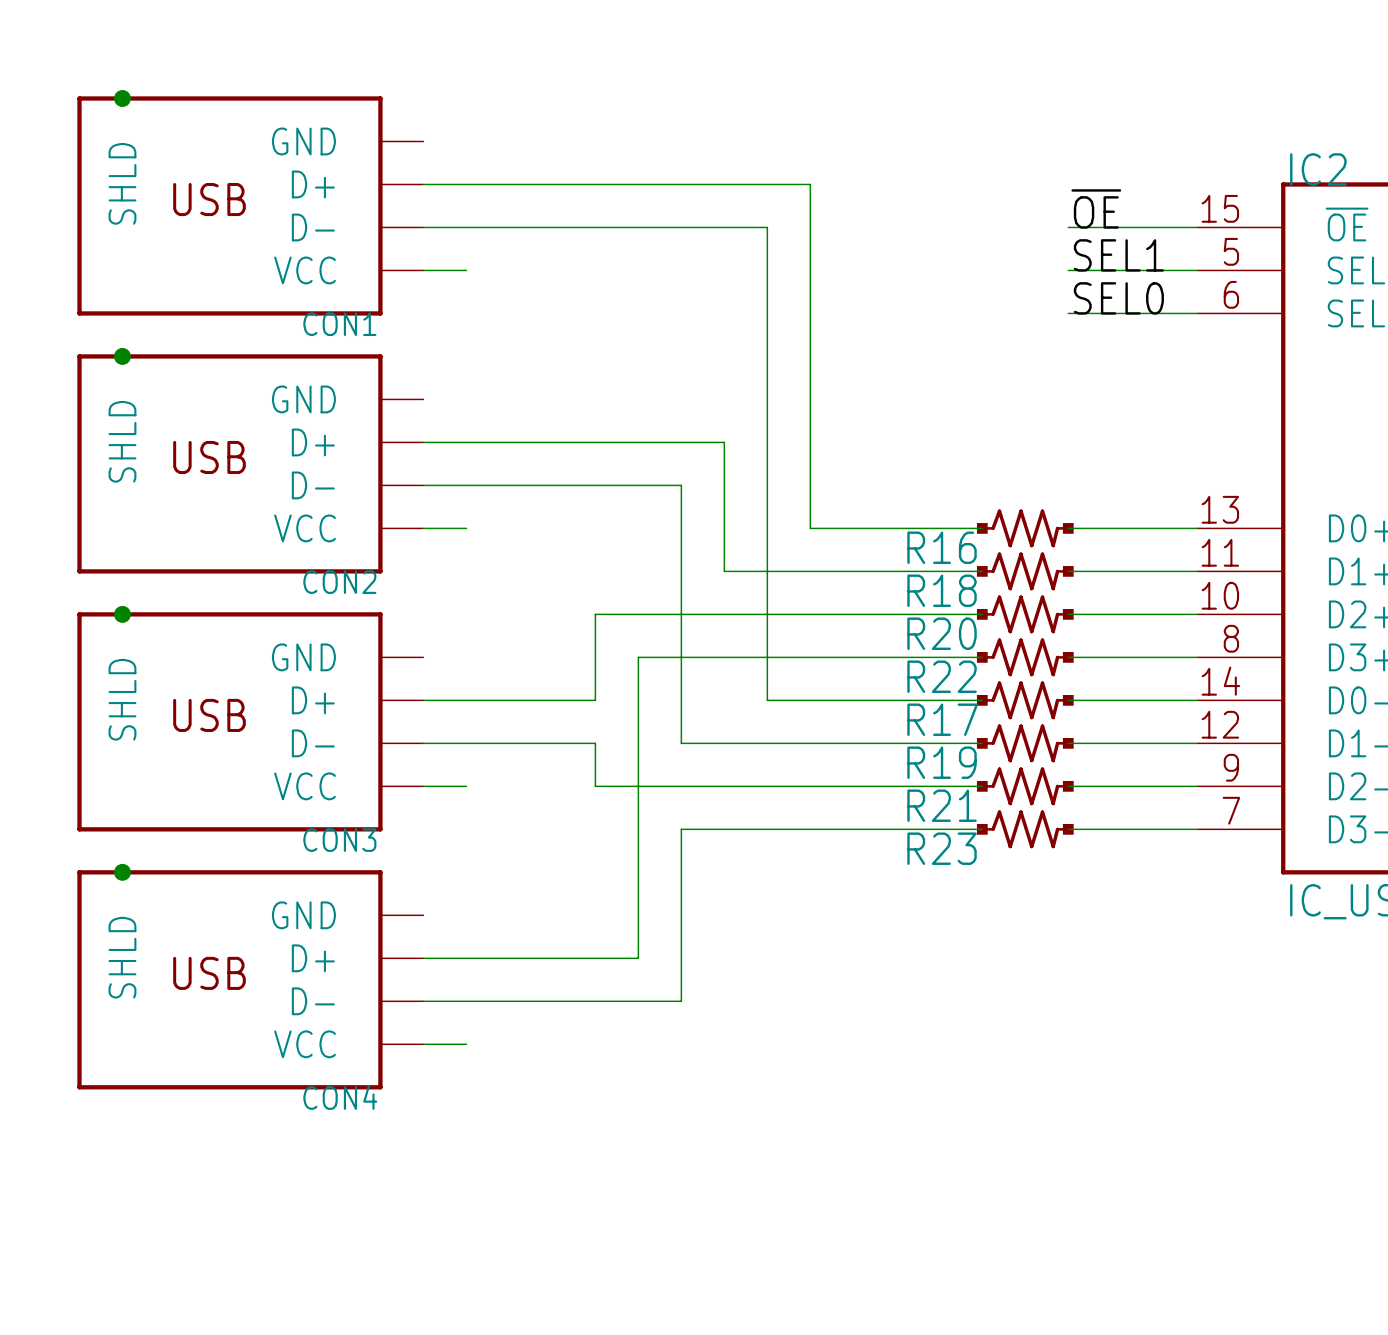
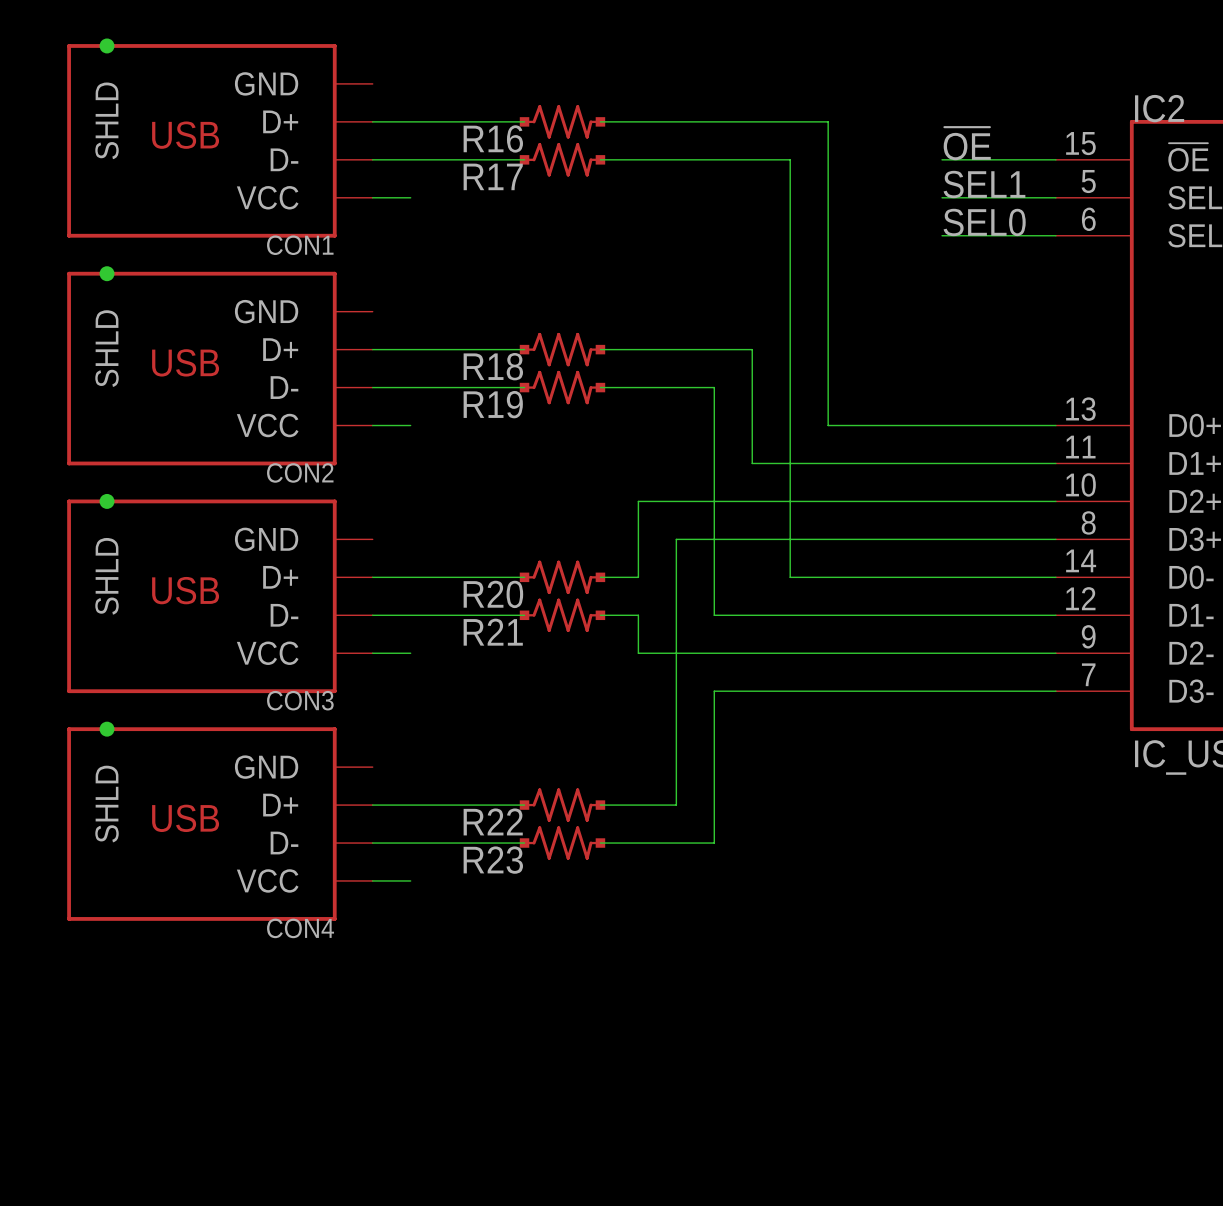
wire: (595, 184) (681, 184) -> none
wire: (810, 184) (810, 485) -> (714, 121) (828, 121) (828, 425)
wire: (595, 227) (681, 227) -> none
wire: (767, 227) (767, 657) (638, 657) (638, 958) (595, 958) -> (676, 159) (790, 159) (790, 577)
wire: (724, 442) (724, 571) (853, 571) -> (638, 349) (752, 349) (752, 463)
wire: (595, 485) (681, 485) (681, 743) -> none
wire: none -> (600, 387) (714, 387)
wire: (810, 528) (939, 528) -> (714, 425) (714, 615)
R16 position: (1025, 528) -> (562, 121)
R18 position: (1025, 571) -> (562, 349)
wire: (724, 614) (595, 614) (595, 700) -> (638, 501) (638, 577) (600, 577)
R20 position: (1025, 614) -> (562, 577)
R22 position: (1025, 657) -> (562, 805)
wire: (767, 700) (896, 700) -> (676, 577) (676, 805) (600, 805)
R17 position: (1025, 700) -> (562, 159)
wire: (595, 743) (595, 786) (724, 786) -> none
wire: (724, 743) (810, 743) -> (638, 615) (638, 653)
R19 position: (1025, 743) -> (562, 387)
R21 position: (1025, 786) -> (562, 615)
wire: (810, 829) (681, 829) (681, 1001) (595, 1001) -> (714, 691) (714, 843) (600, 843)
R23 position: (1025, 829) -> (562, 843)

